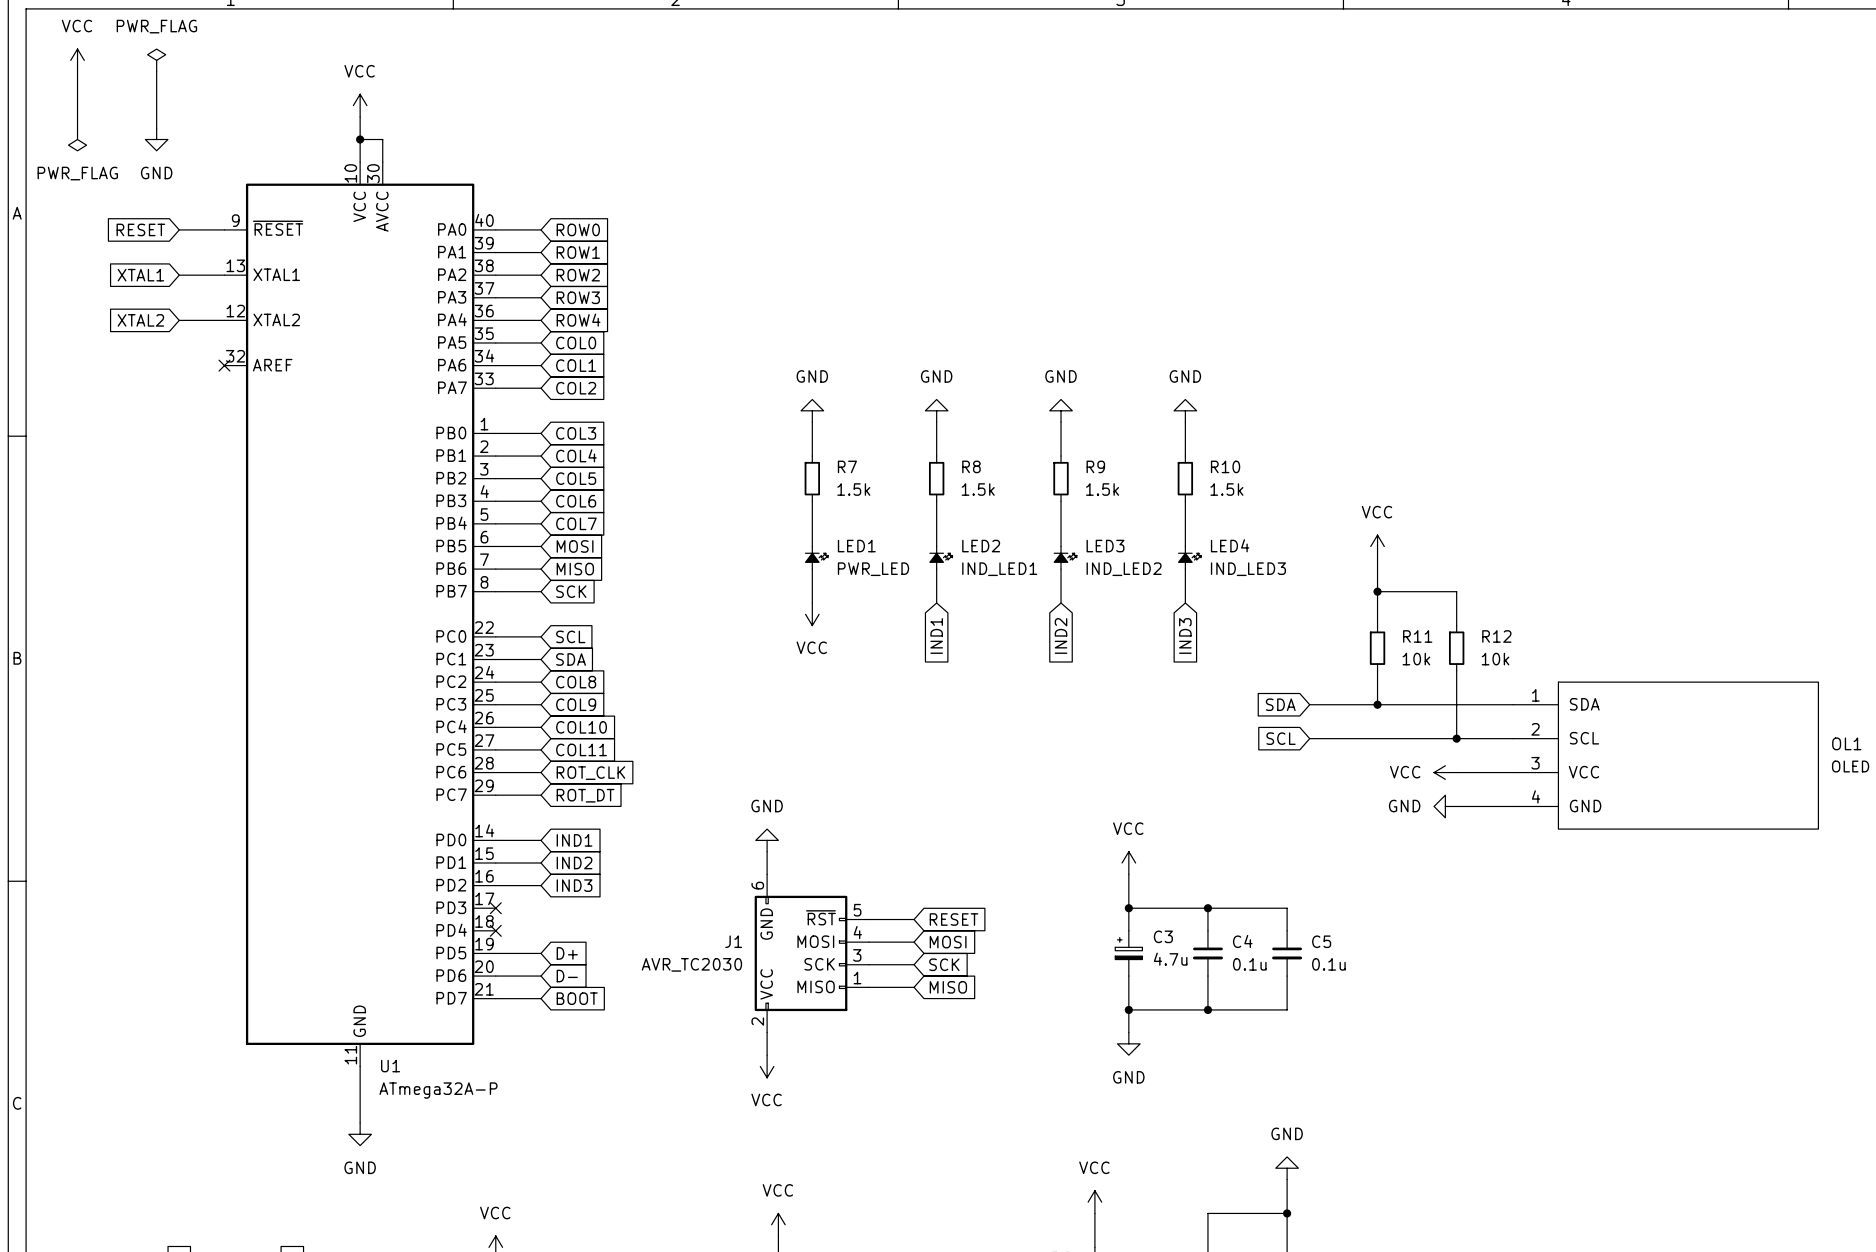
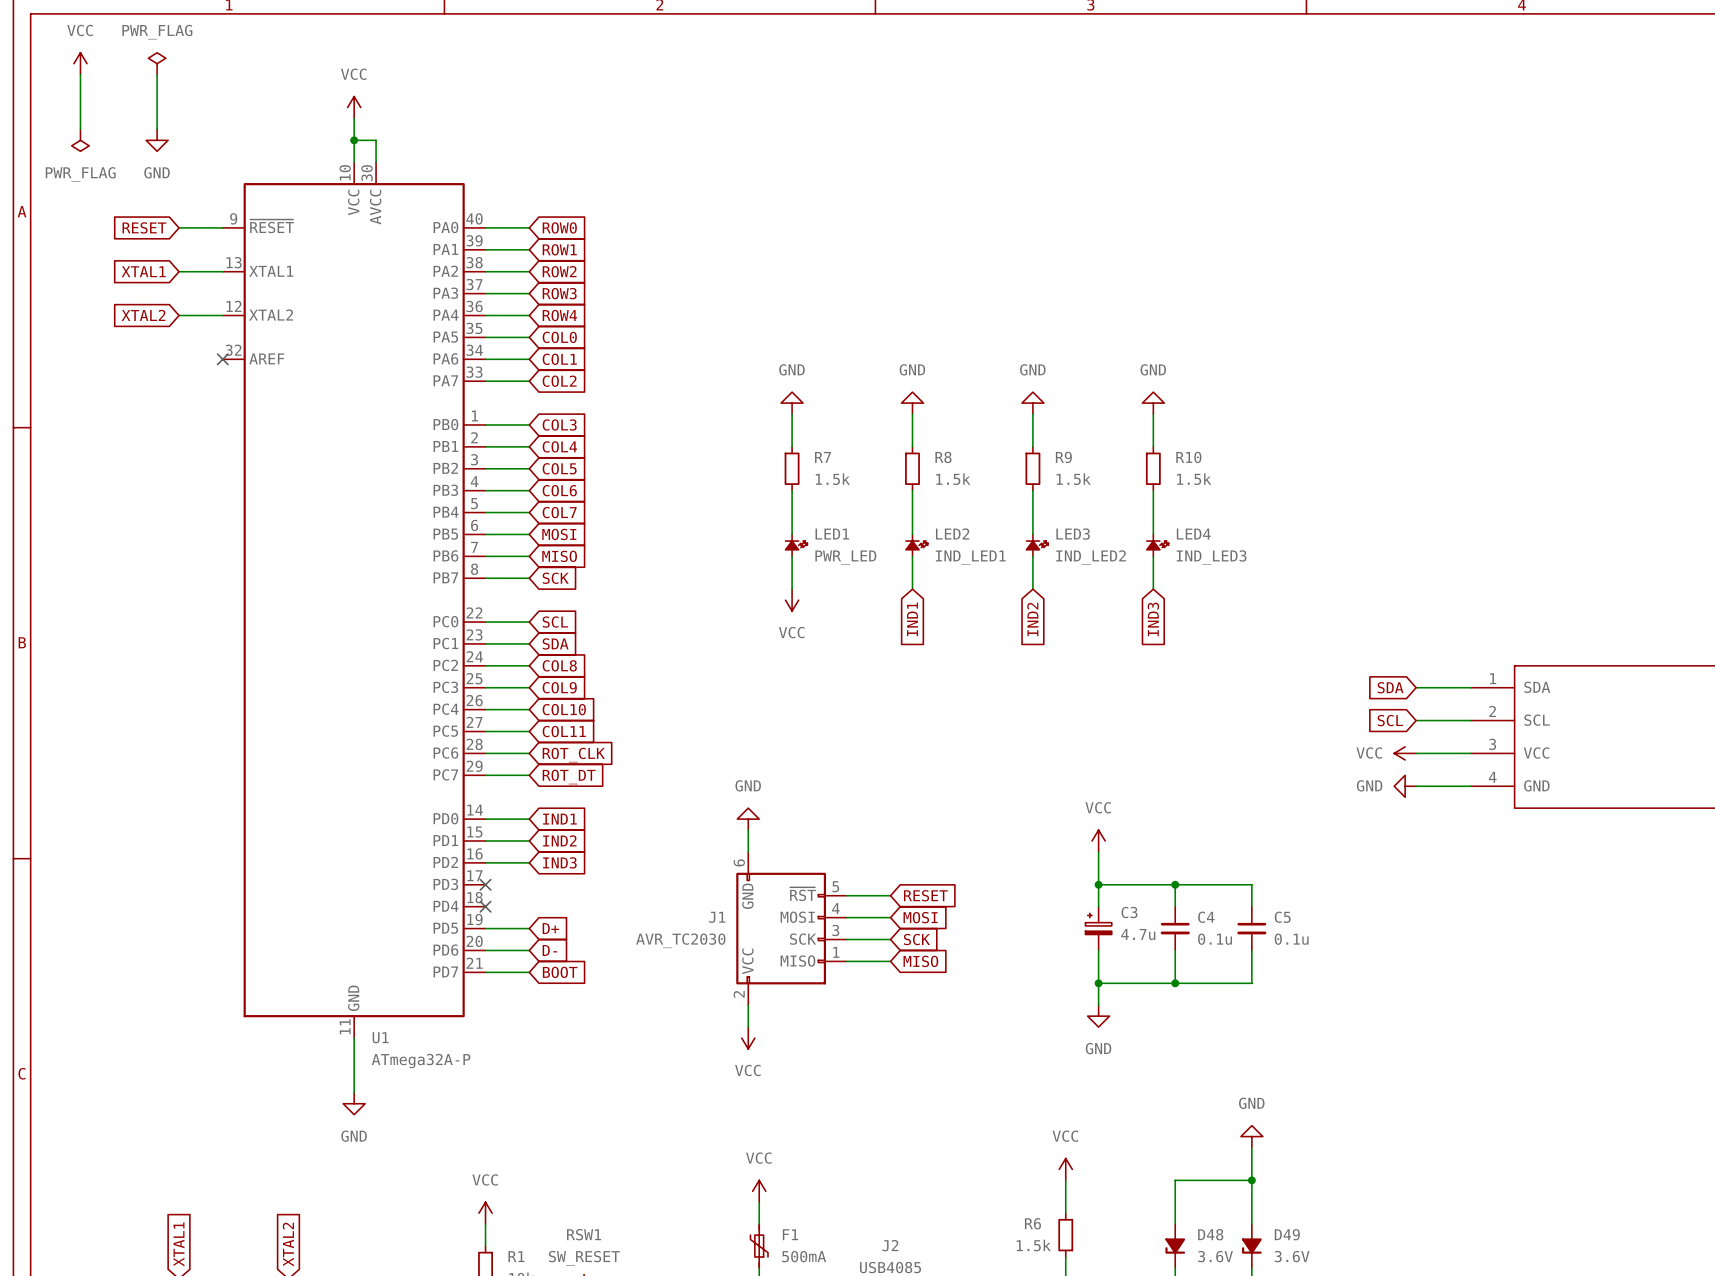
power symbol: VCC (1377, 546) -> none
wire: (1377, 557) (1377, 625) -> none
wire: (1377, 591) (1456, 591) (1456, 625) -> none
junction: (1377, 591) -> none
R11: 10k (1377, 648) -> none
R12: 10k (1456, 648) -> none
wire: (1377, 670) (1377, 704) -> none
wire: (1456, 670) (1456, 738) (1309, 738) -> none
global label position: SDA (1280, 704) -> SDA (1390, 687)
wire: (1309, 704) (1456, 704) -> none
junction: (1377, 704) -> none
global label position: SCL (1281, 738) -> SCL (1390, 720)
junction: (1456, 738) -> none

